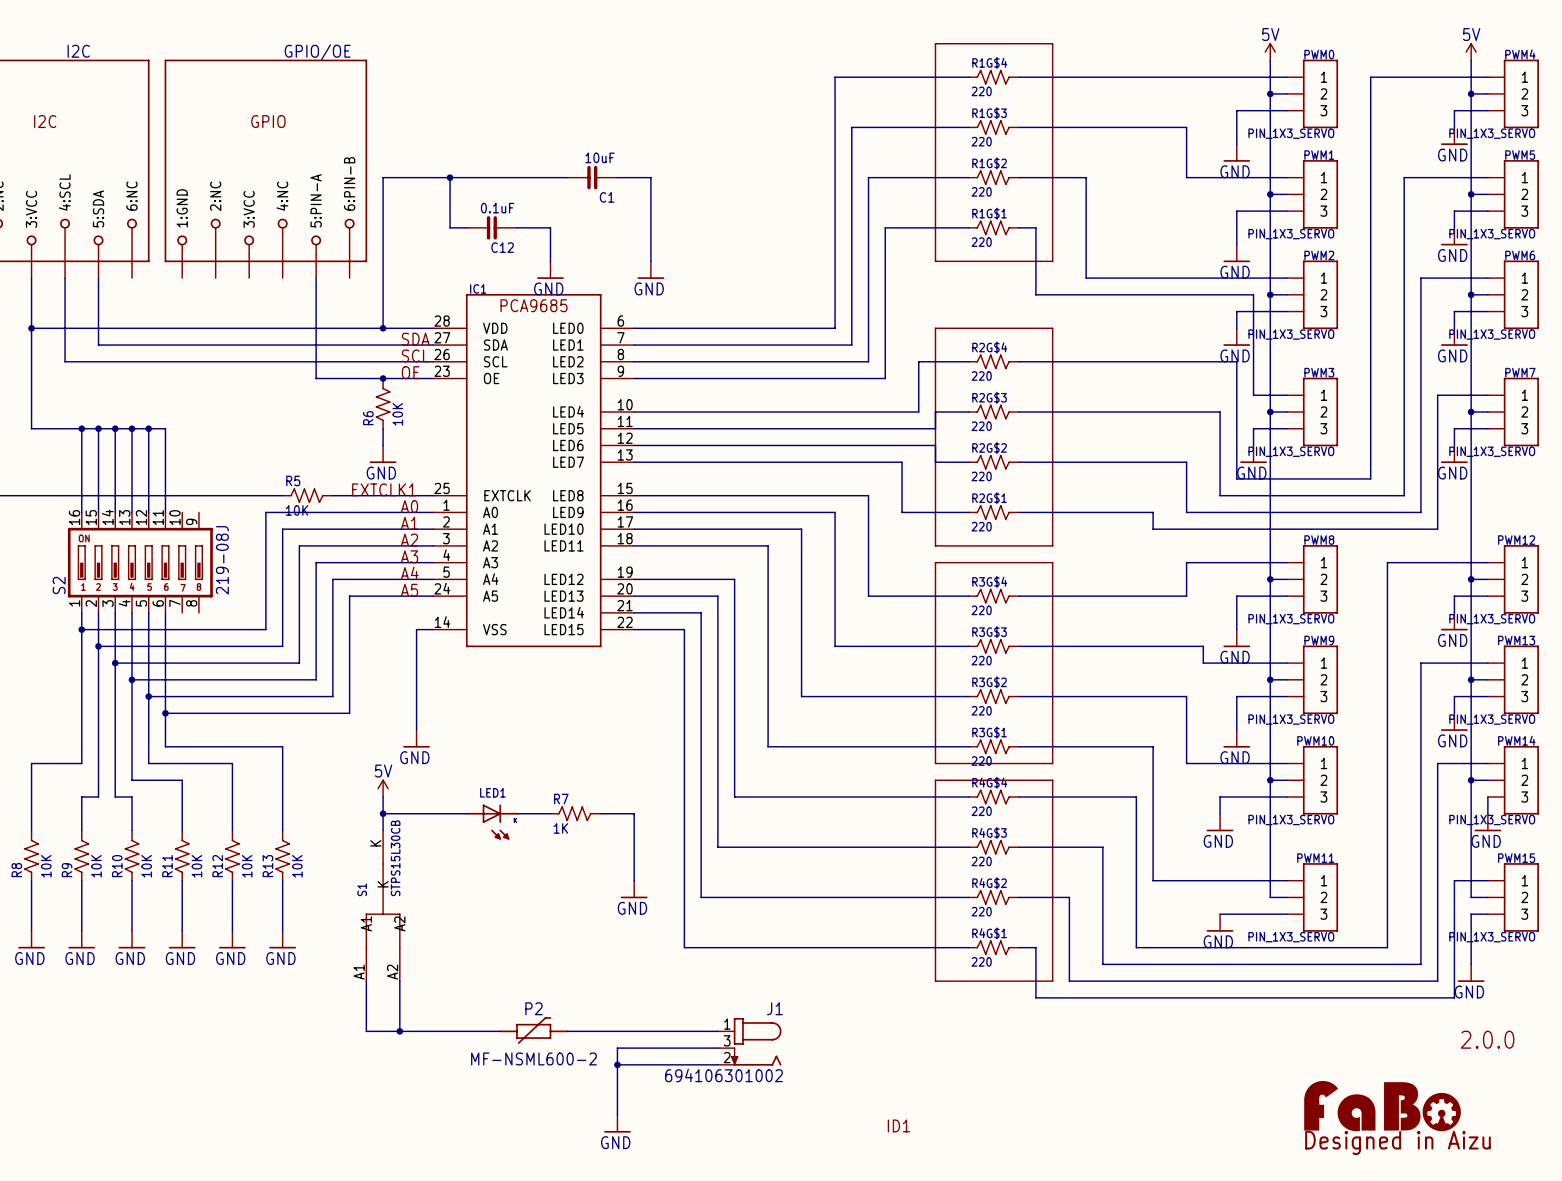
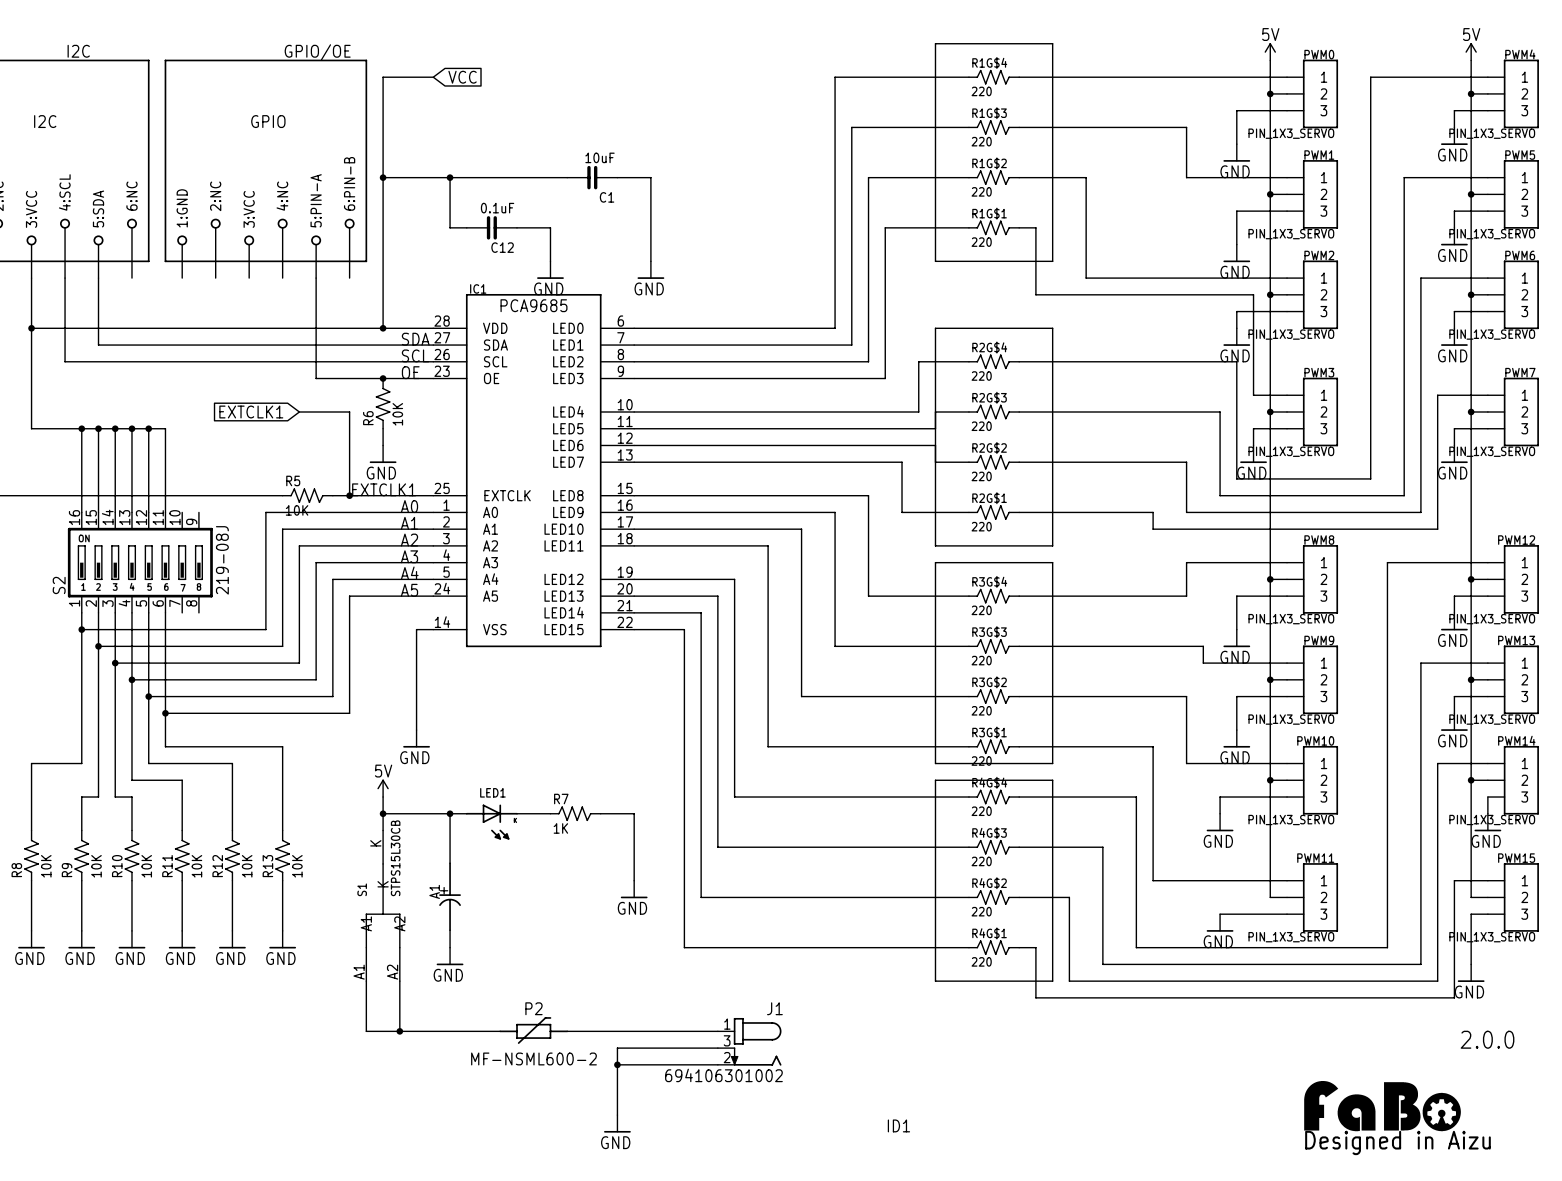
wire: none -> (433, 77) (383, 77) (383, 177)
global label: none -> VCC (462, 77)
junction: none -> (383, 177)
global label: none -> EXTCLK1 (251, 411)
wire: none -> (299, 411) (349, 411) (349, 495)
junction: none -> (349, 495)
wire: none -> (450, 813) (450, 863)
junction: none -> (450, 813)
A1: none -> (450, 896)
wire: none -> (450, 930) (450, 947)
power symbol: none -> GND (450, 956)

